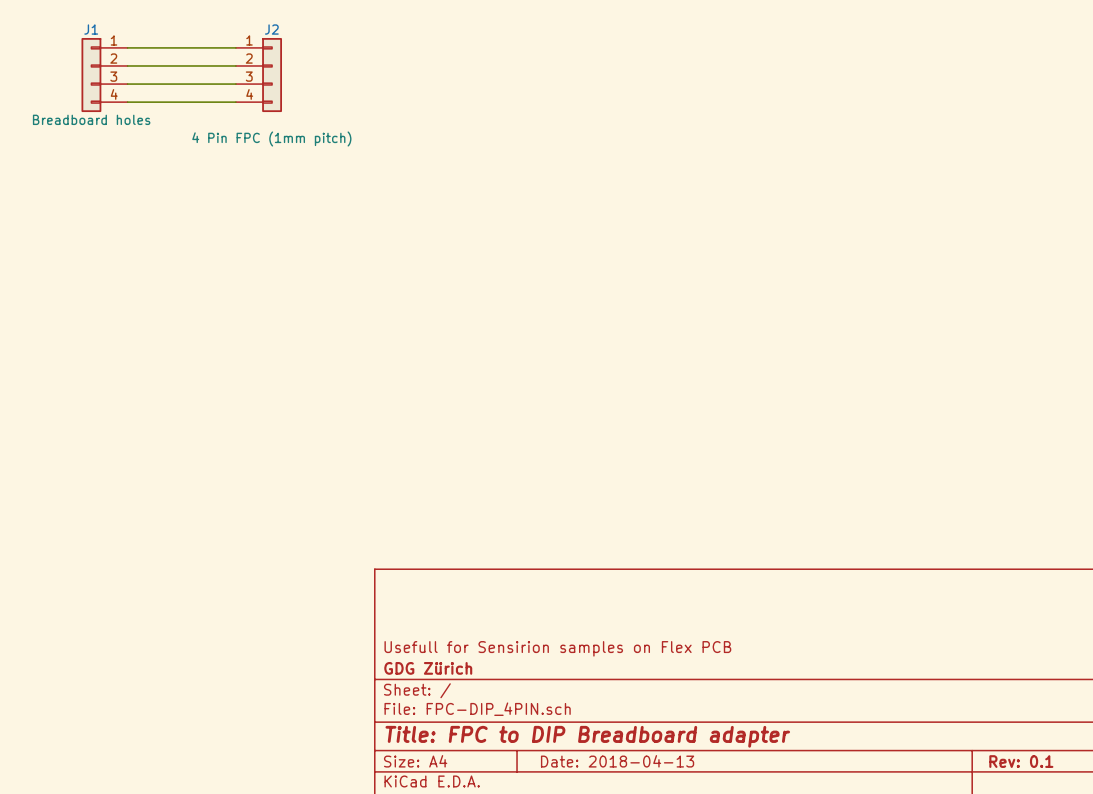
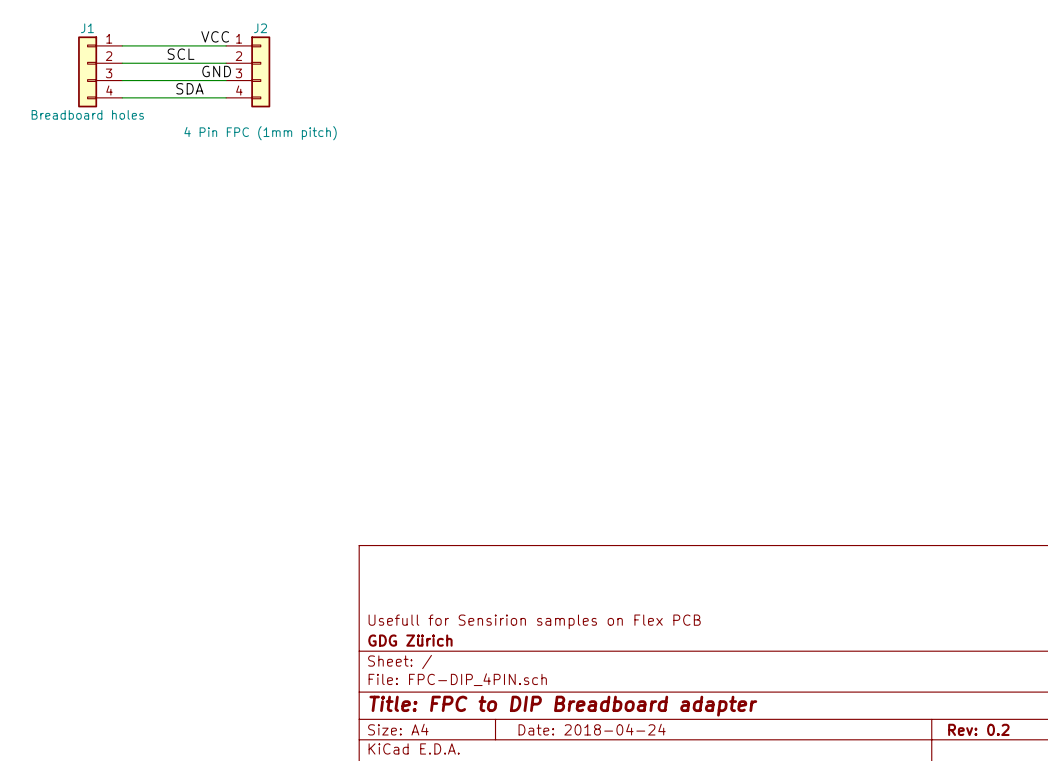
label: none -> VCC (215, 36)
label: none -> SCL (181, 54)
label: none -> GND (216, 71)
label: none -> SDA (189, 88)
title block: Date: 2018-04-13 (617, 761) -> Date: 2018-04-24 (592, 729)
title block: Rev: 0.1 (1021, 761) -> Rev: 0.2 (978, 729)

